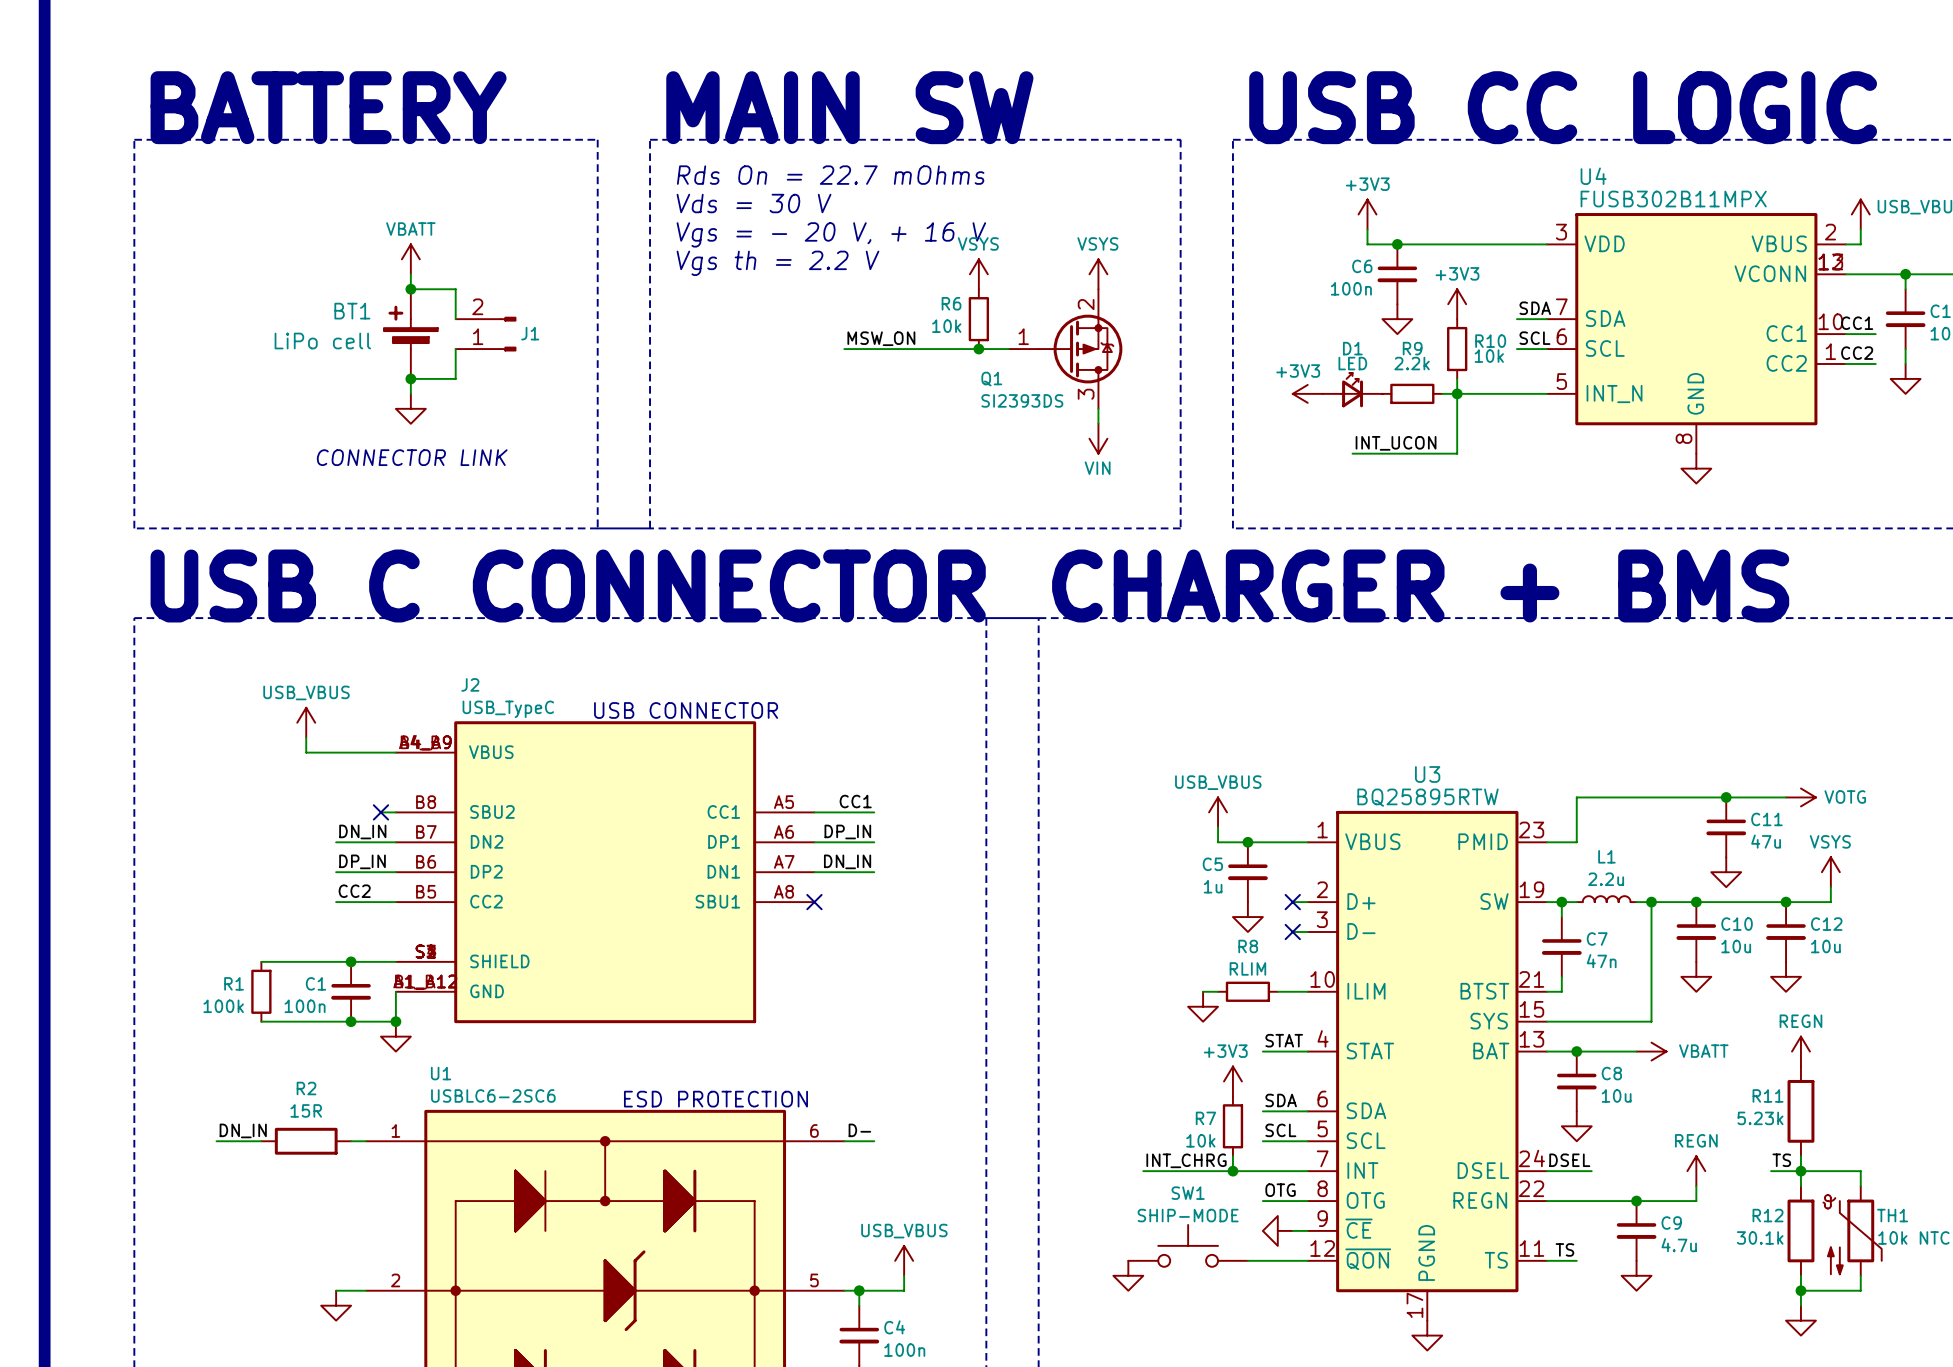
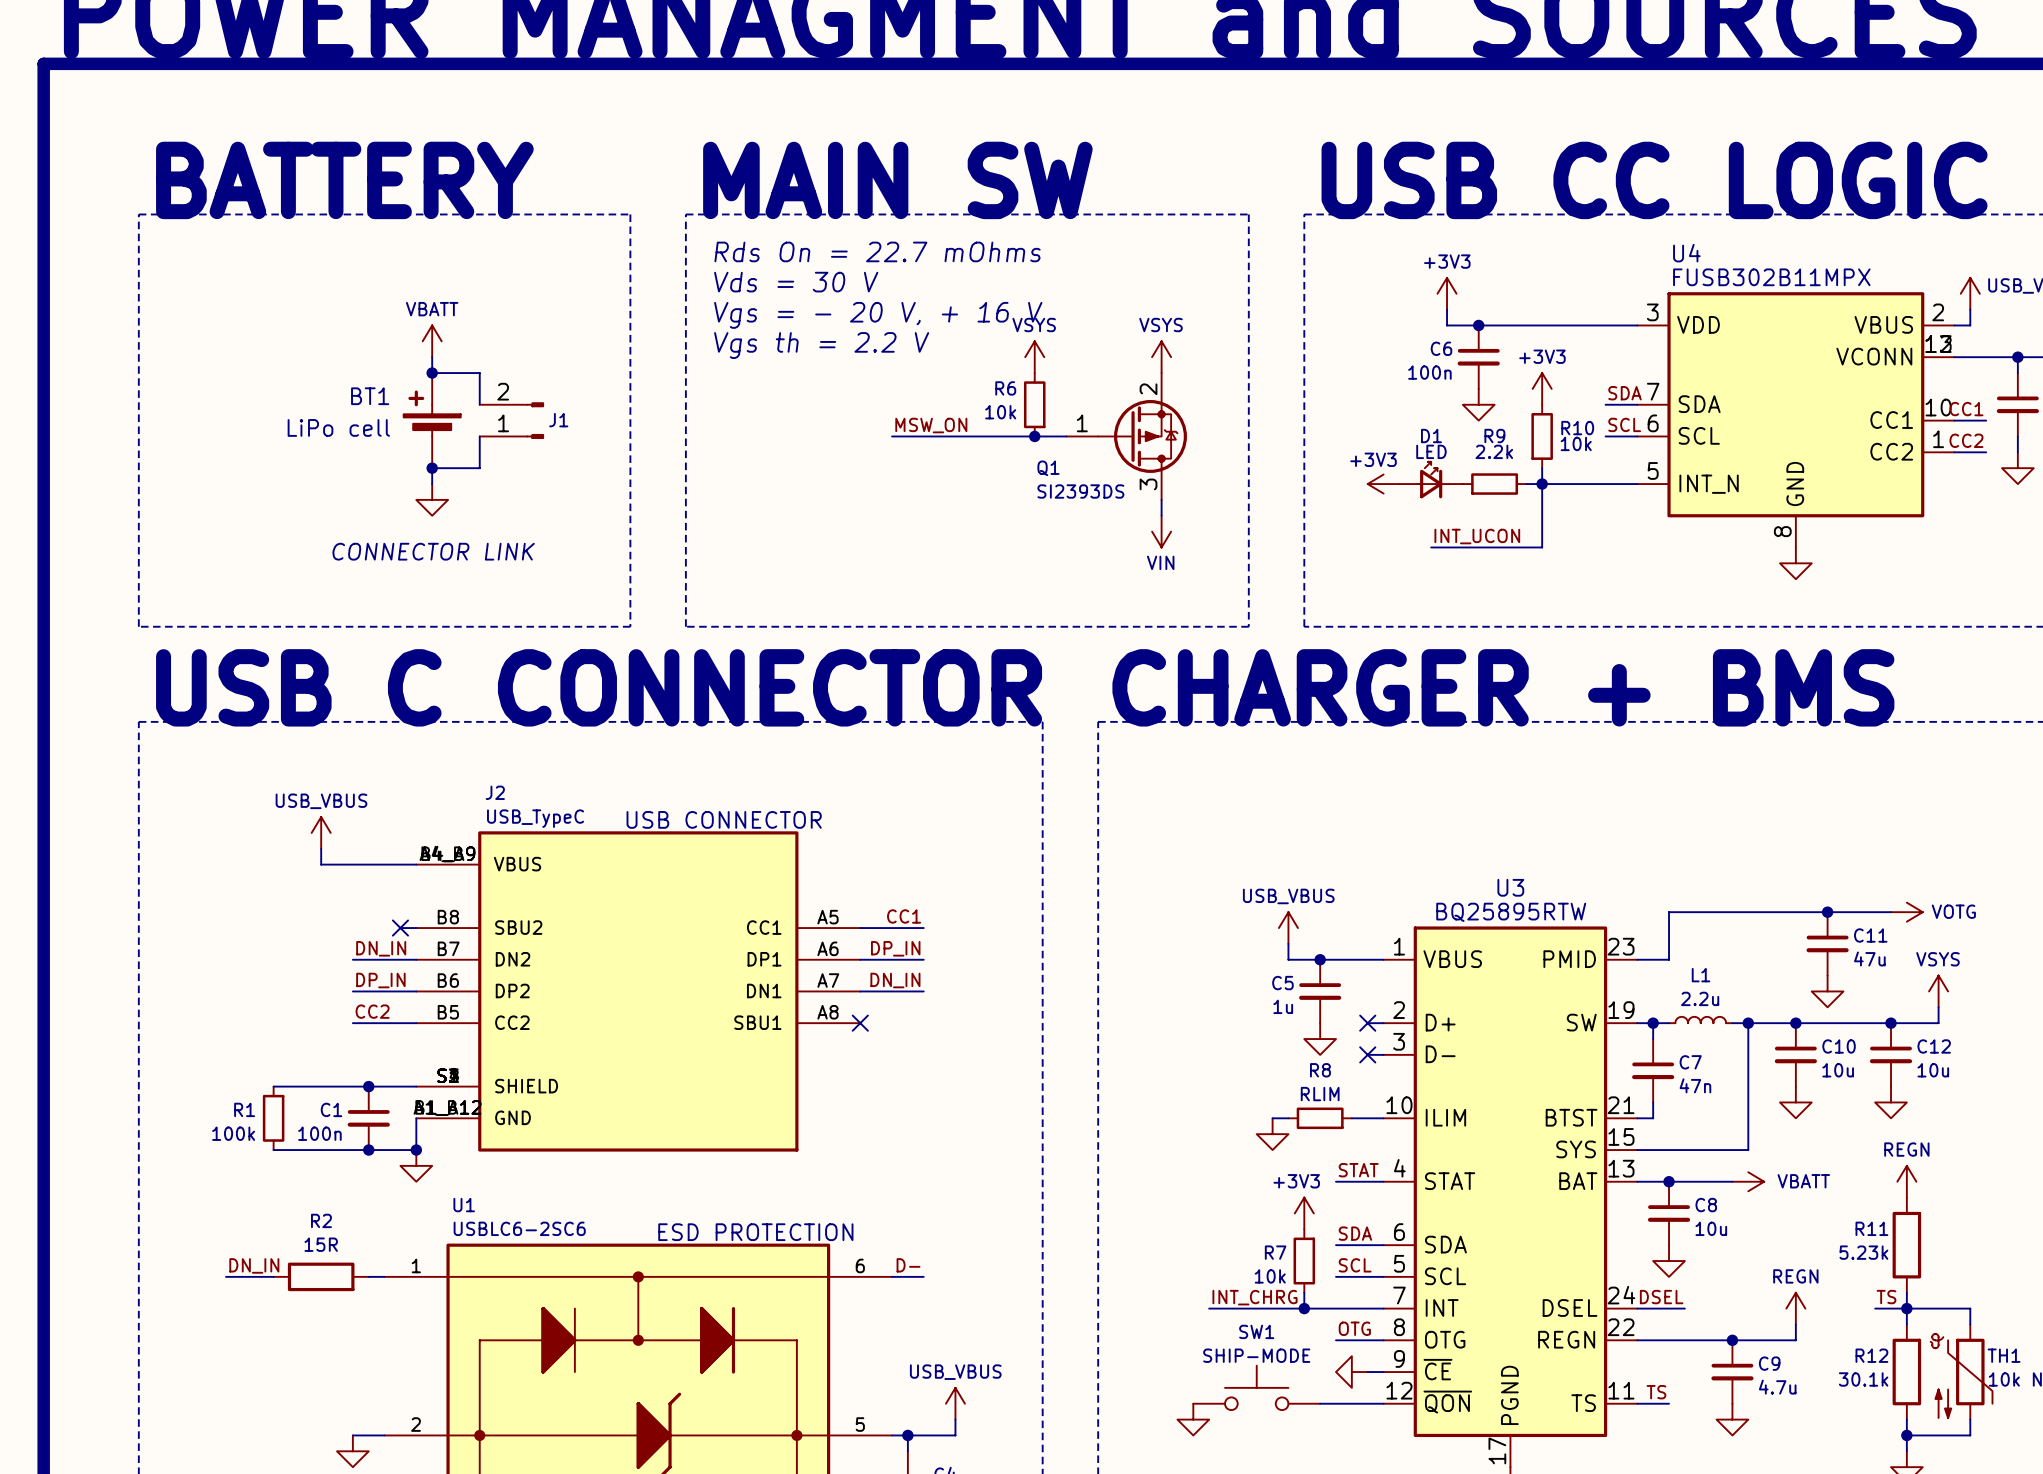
line: (597, 528) (650, 528) -> none
line: (986, 618) (1038, 618) -> none

